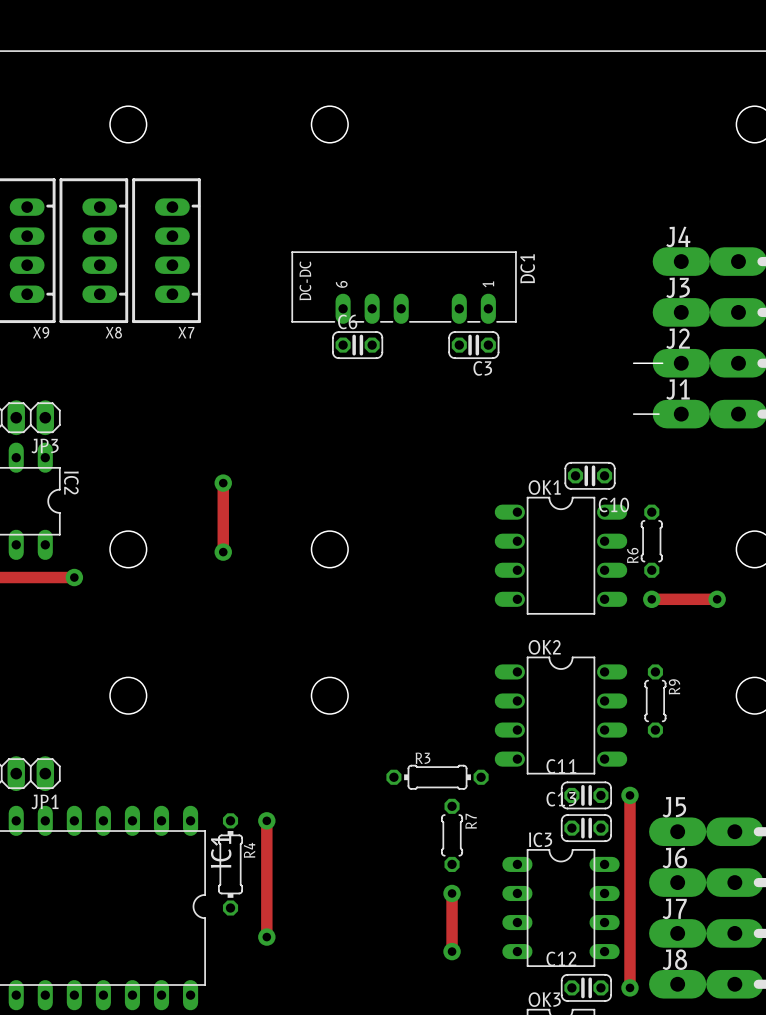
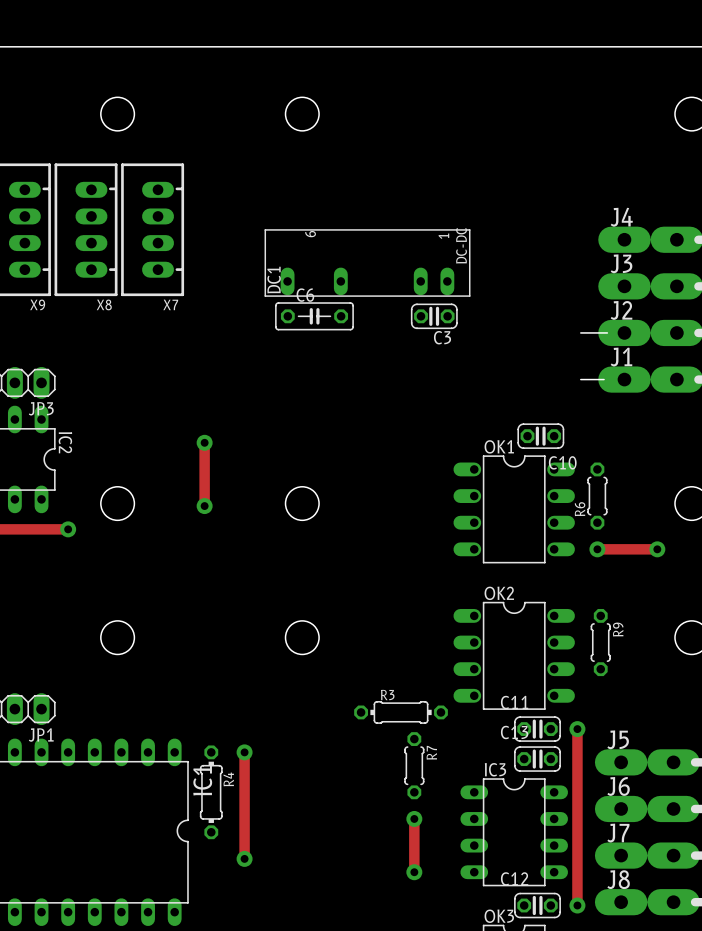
DC1 footprint: [291, 251, 517, 324] -> [264, 229, 471, 297]
DC1 name position: DC1 (527, 268) -> DC1 (274, 280)
C6 footprint: [332, 331, 384, 360] -> [275, 302, 354, 331]

